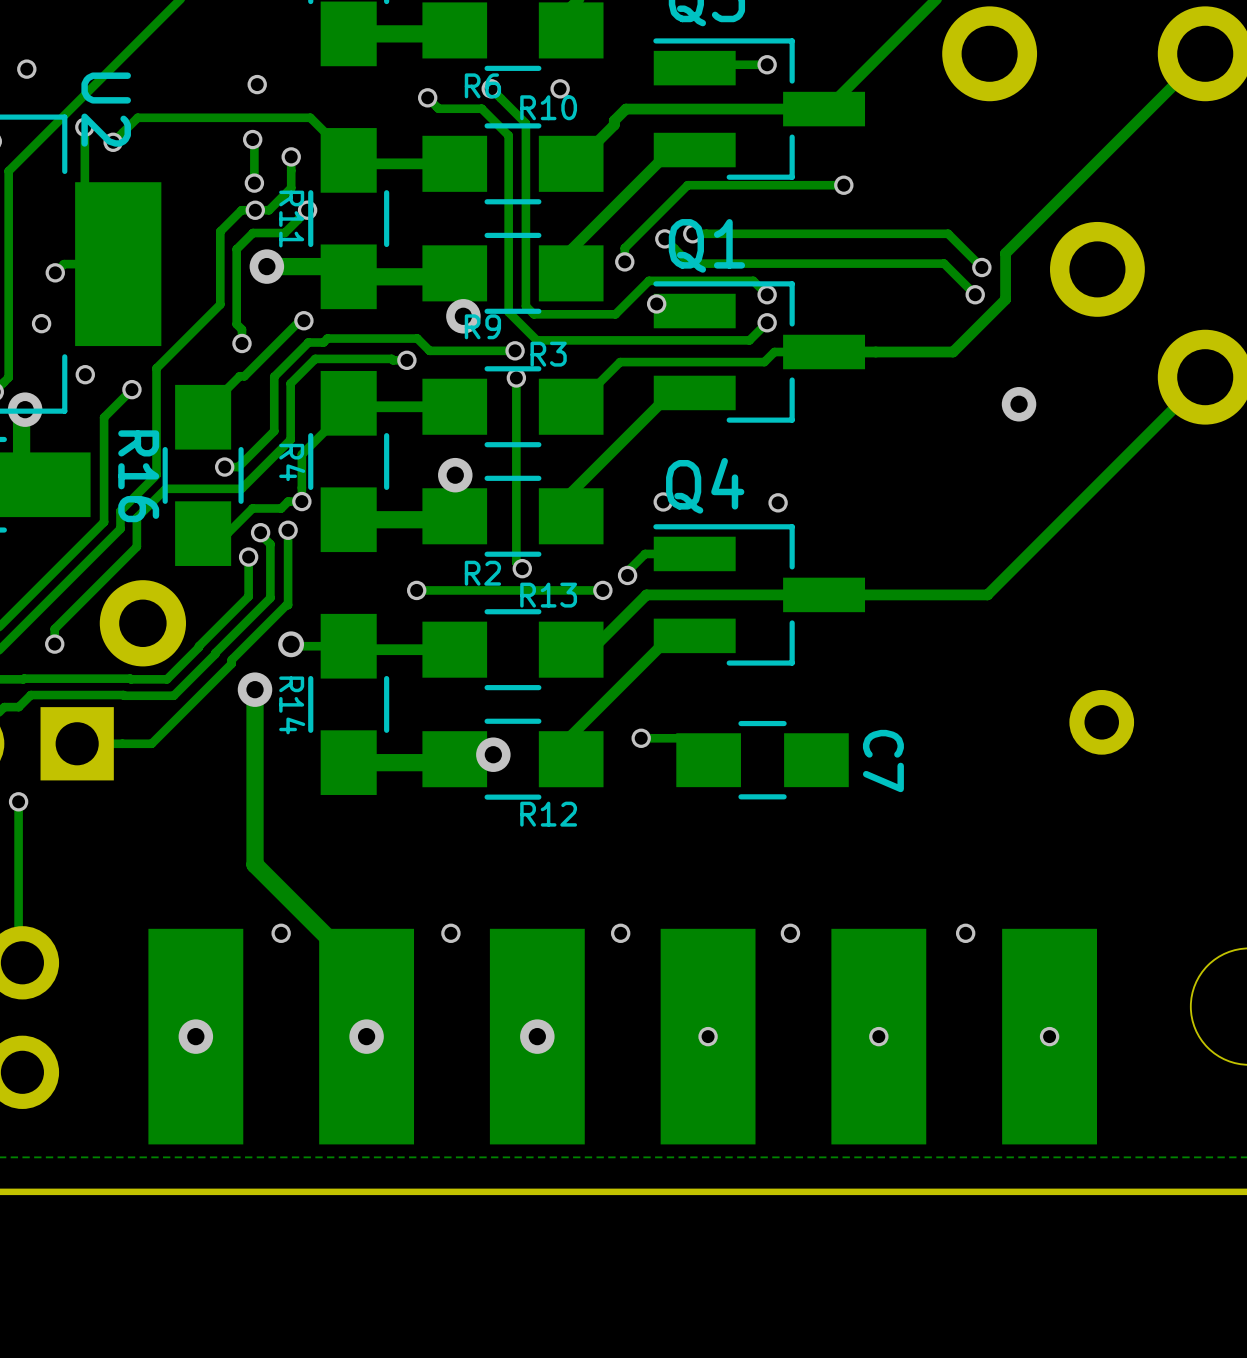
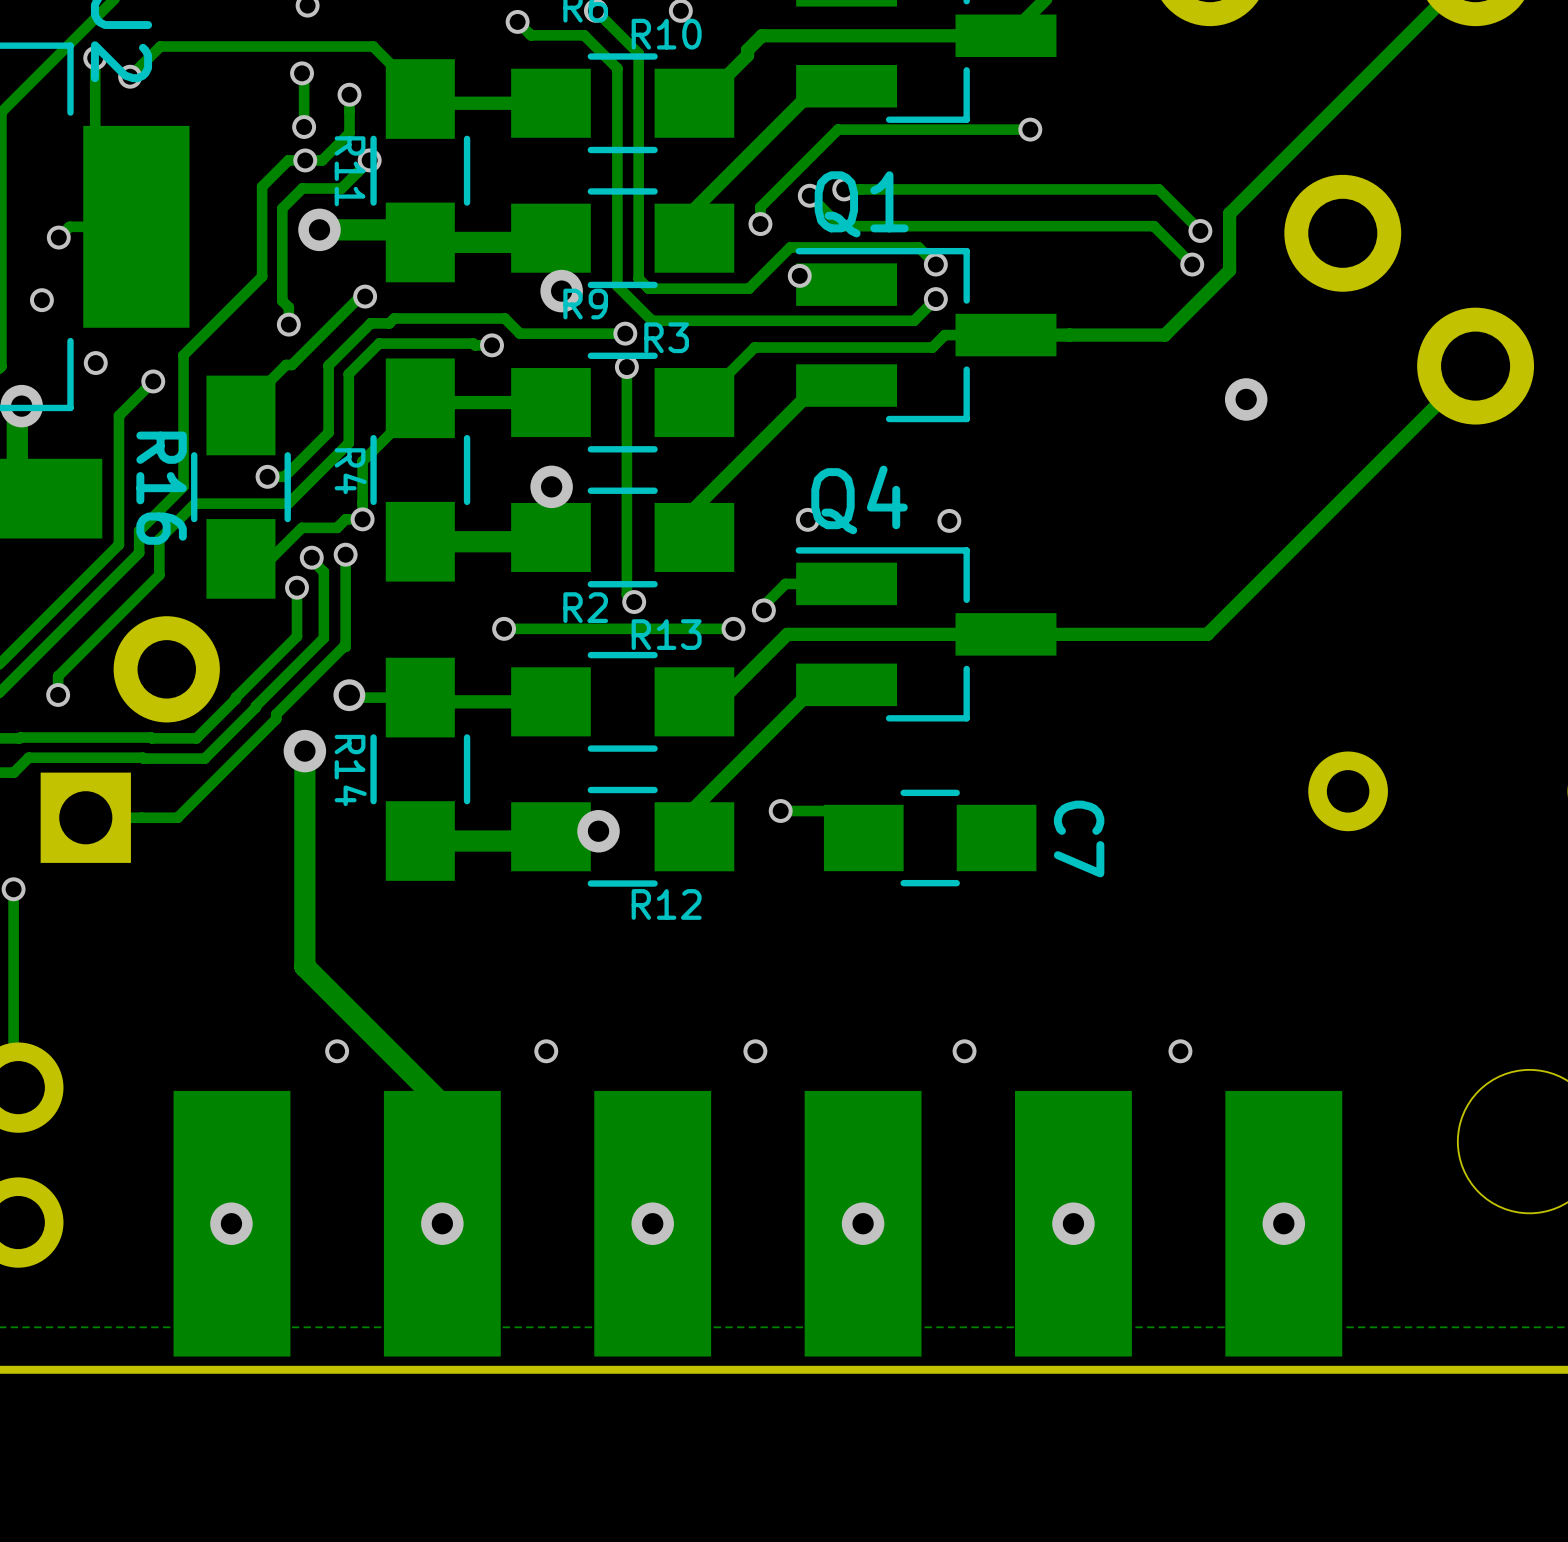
via position: (195, 1036) -> (231, 1223)
via position: (366, 1036) -> (442, 1223)
via position: (537, 1036) -> (652, 1223)
part position: (622, 1036) -> (757, 1223)
via: (708, 1036) -> none
via: (878, 1036) -> none
via: (1049, 1036) -> none
via: none -> (863, 1223)
via: none -> (1073, 1223)
via: none -> (1283, 1223)

